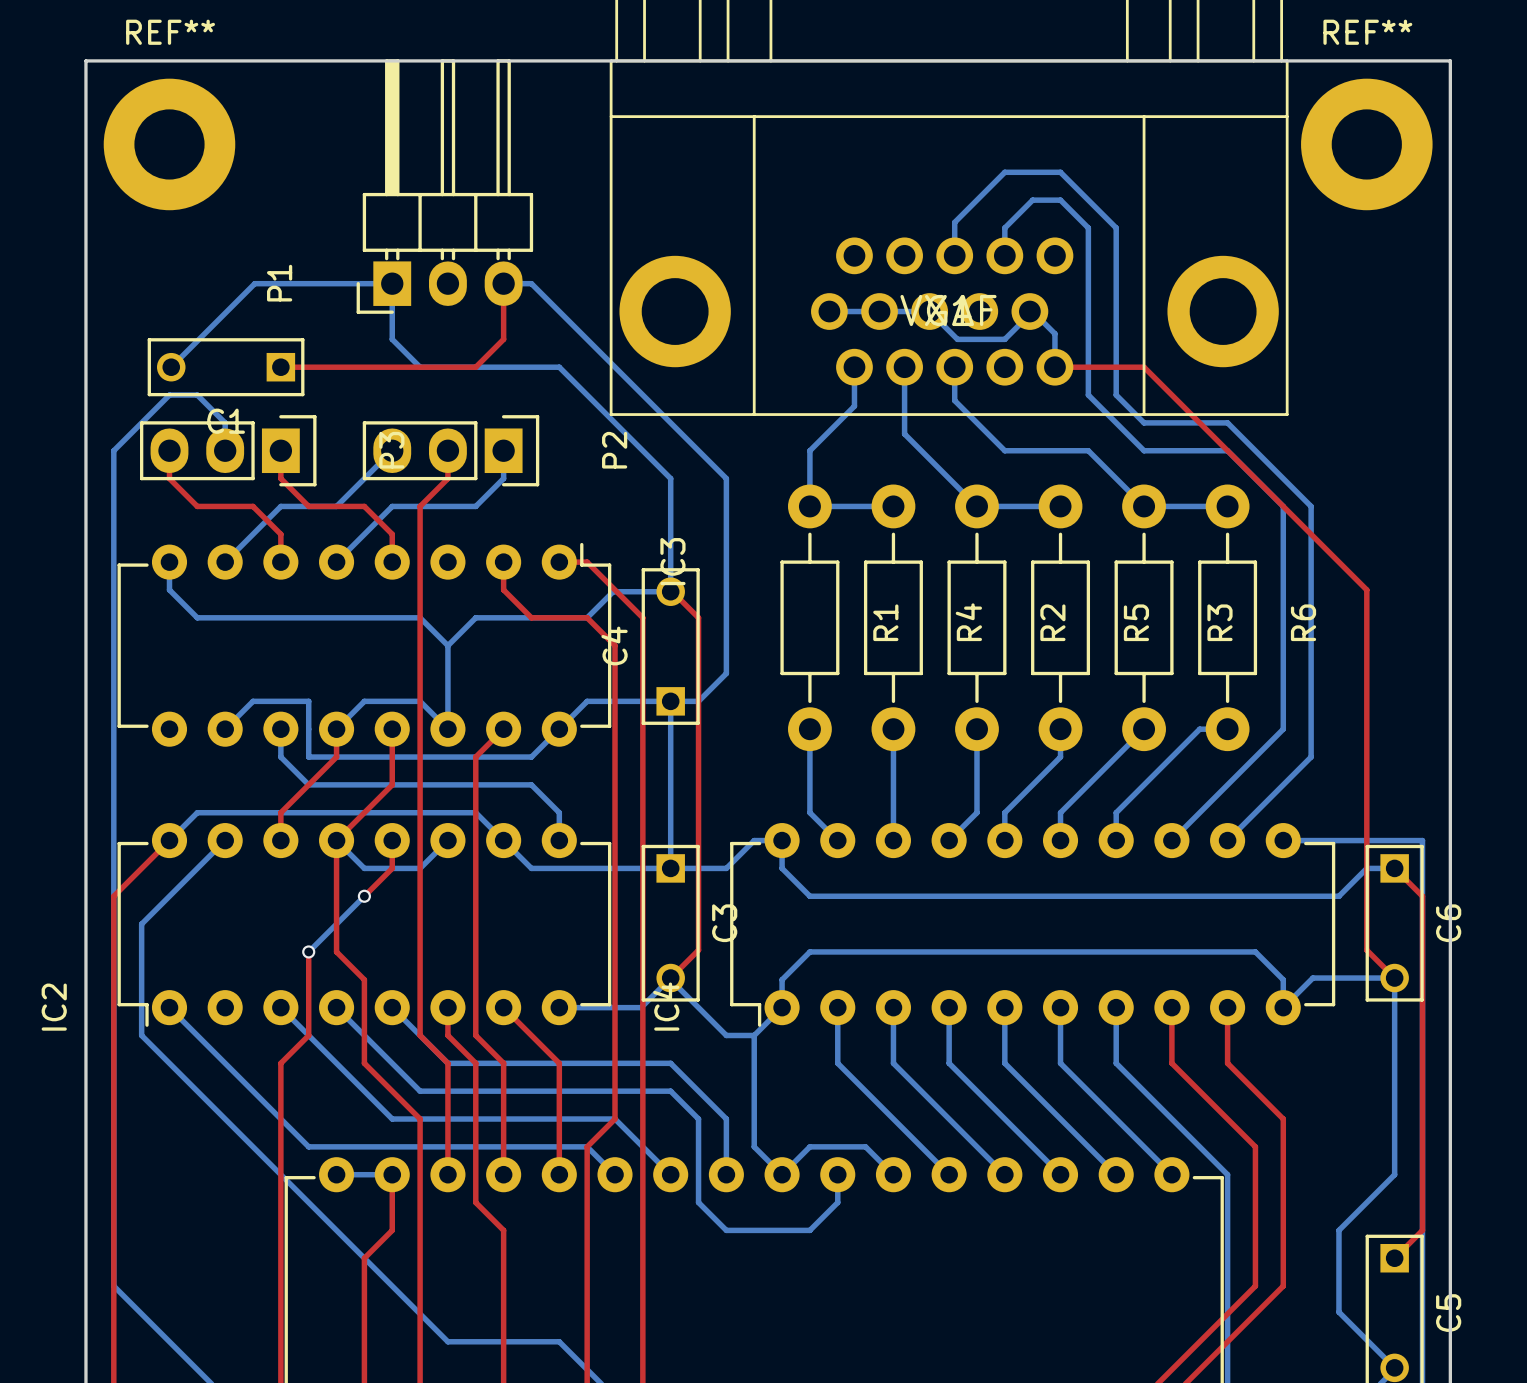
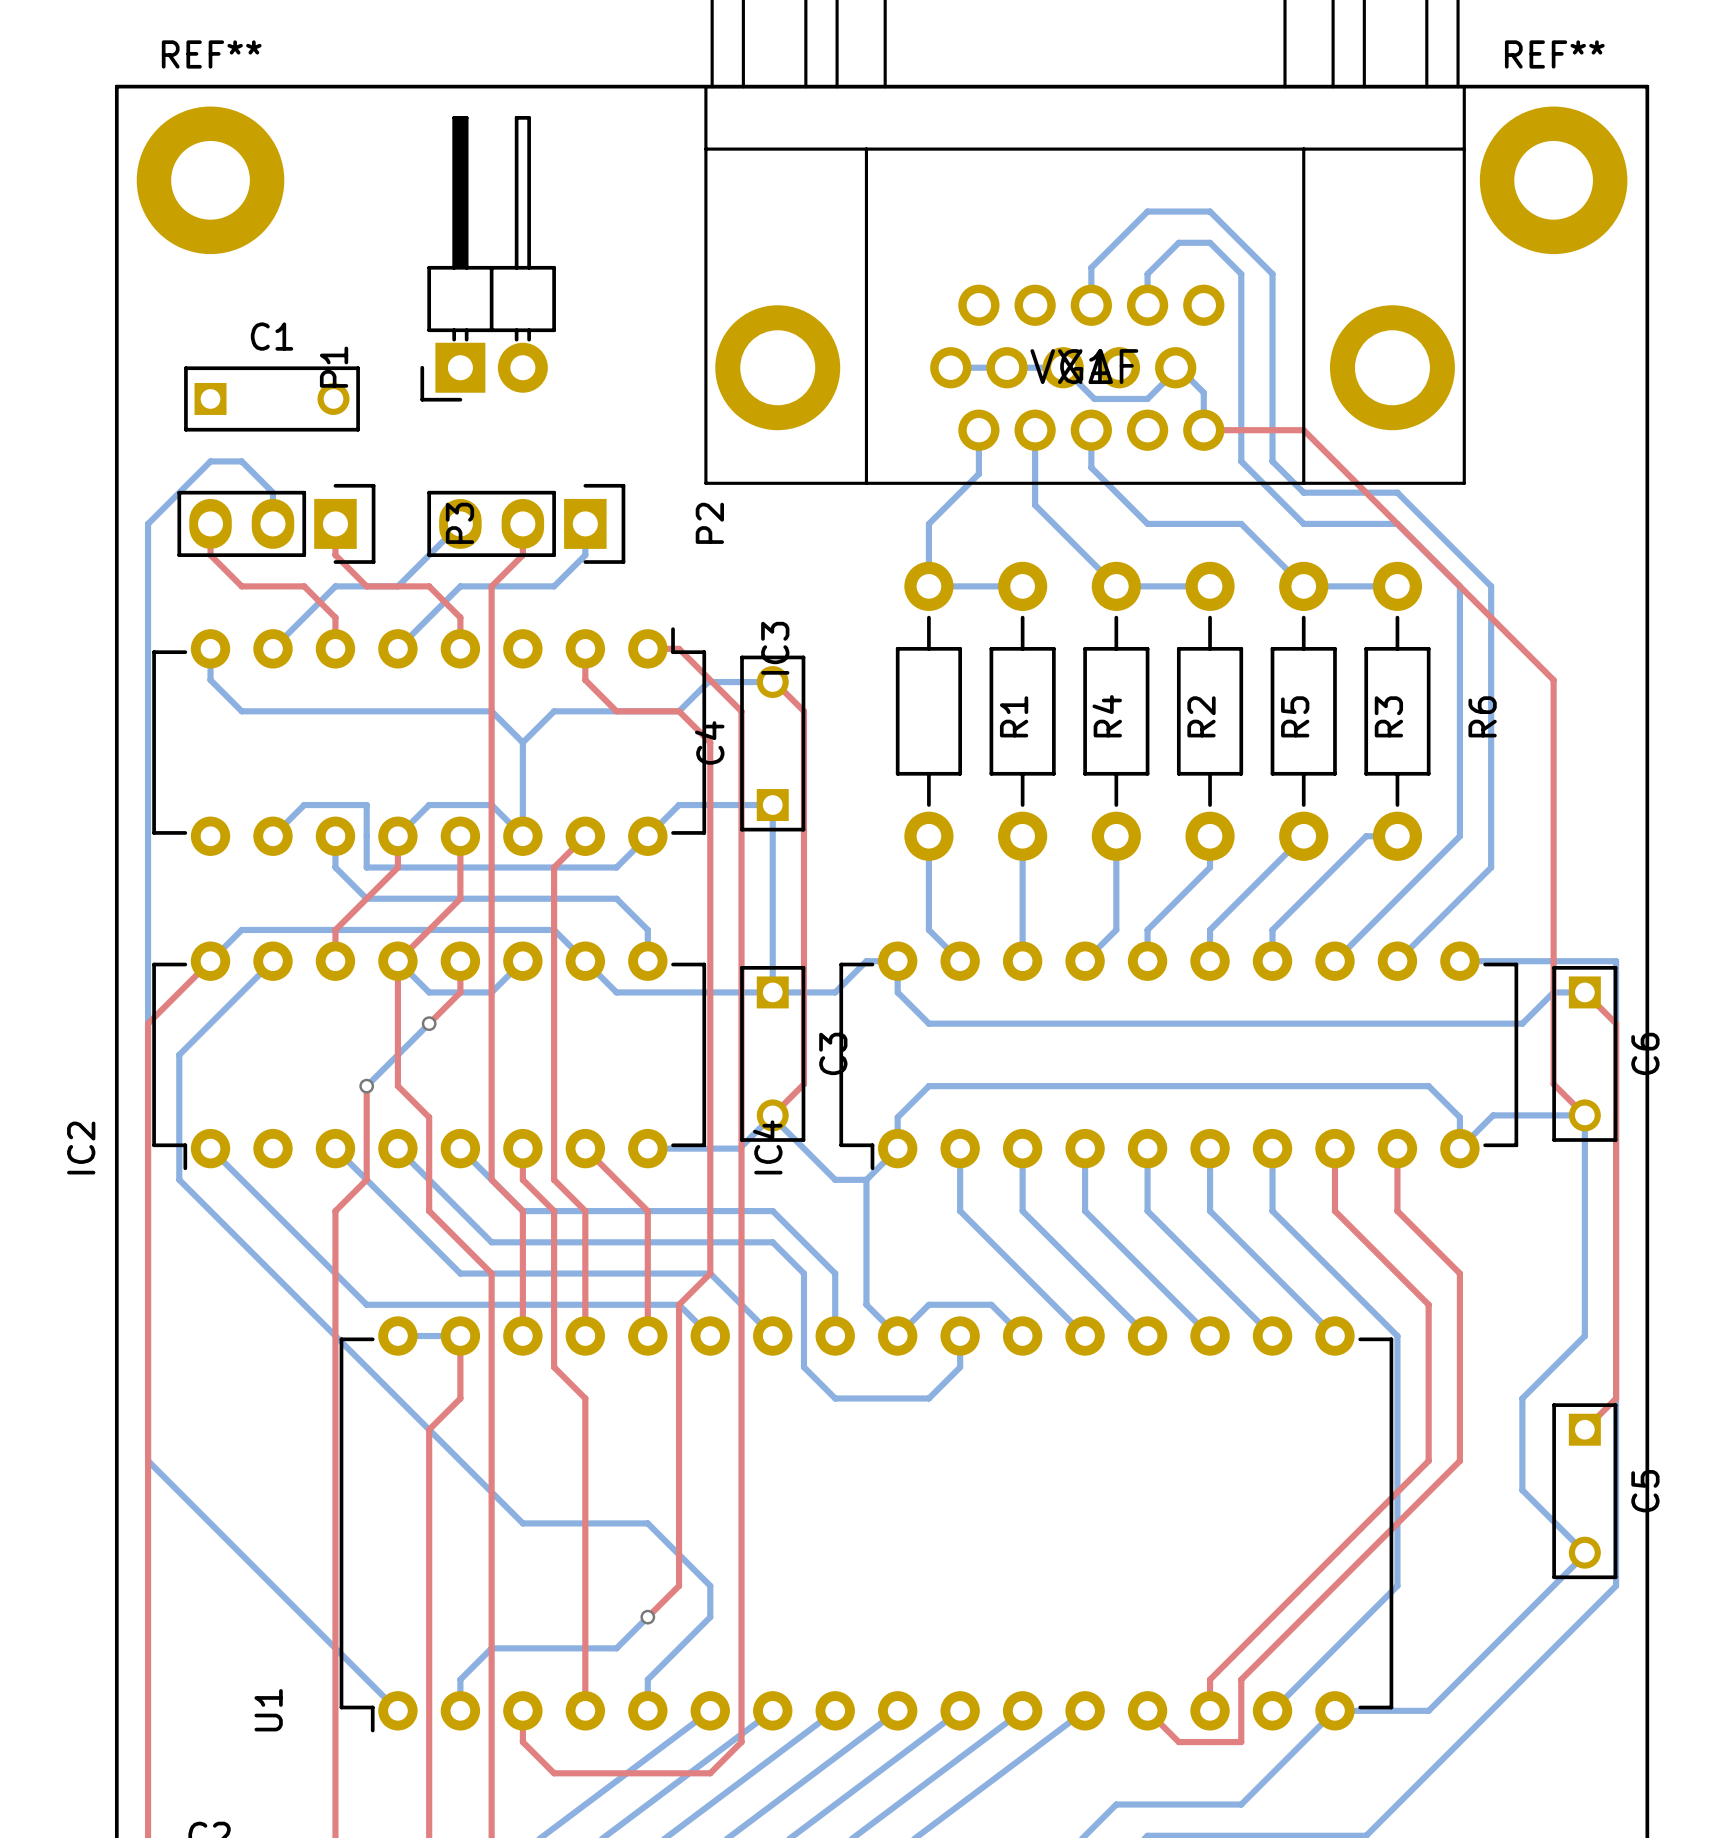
P1 footprint: [356, 59, 534, 314] -> [420, 116, 556, 402]
top track: (503, 283) (503, 339) (475, 367) (280, 367) -> none
bottom track: (503, 283) (531, 283) (726, 478) (726, 673) (698, 701) (670, 701) -> none
bottom track: (171, 367) (254, 283) (392, 283) (392, 339) (420, 367) (559, 367) (670, 478) (670, 591) -> none
C1 rotation: 0° (226, 367) -> 180° (272, 398)

